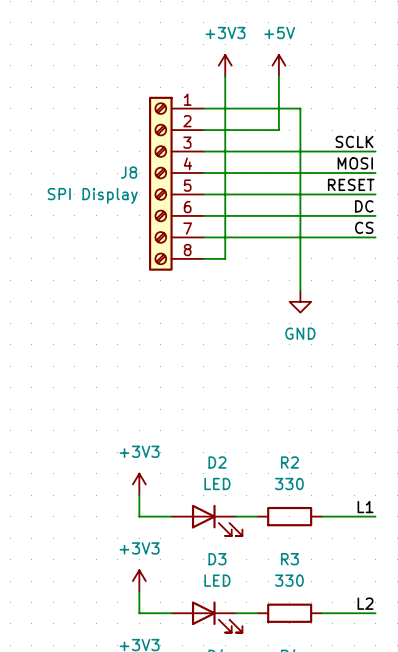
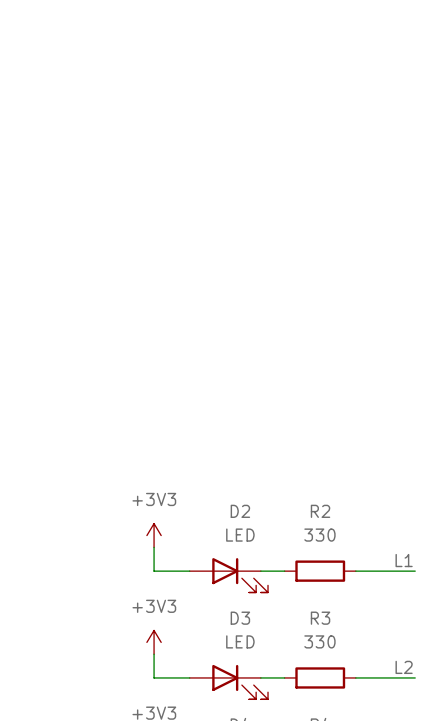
power symbol: +3V3 (225, 65) -> none
power symbol: +5V (278, 65) -> none
wire: (225, 76) (225, 258) (203, 258) -> none
wire: (278, 76) (278, 130) (203, 130) -> none
wire: (203, 108) (300, 108) (300, 291) -> none
label: SCLK (354, 141) -> none
wire: (203, 151) (375, 151) -> none
label: MOSI (355, 163) -> none
wire: (203, 173) (375, 173) -> none
J8: SPI Display (176, 183) -> none
label: RESET (351, 184) -> none
wire: (203, 194) (375, 194) -> none
label: DC (364, 206) -> none
wire: (203, 215) (375, 215) -> none
label: CS (364, 227) -> none
wire: (203, 237) (375, 237) -> none
power symbol: GND (300, 301) -> none

